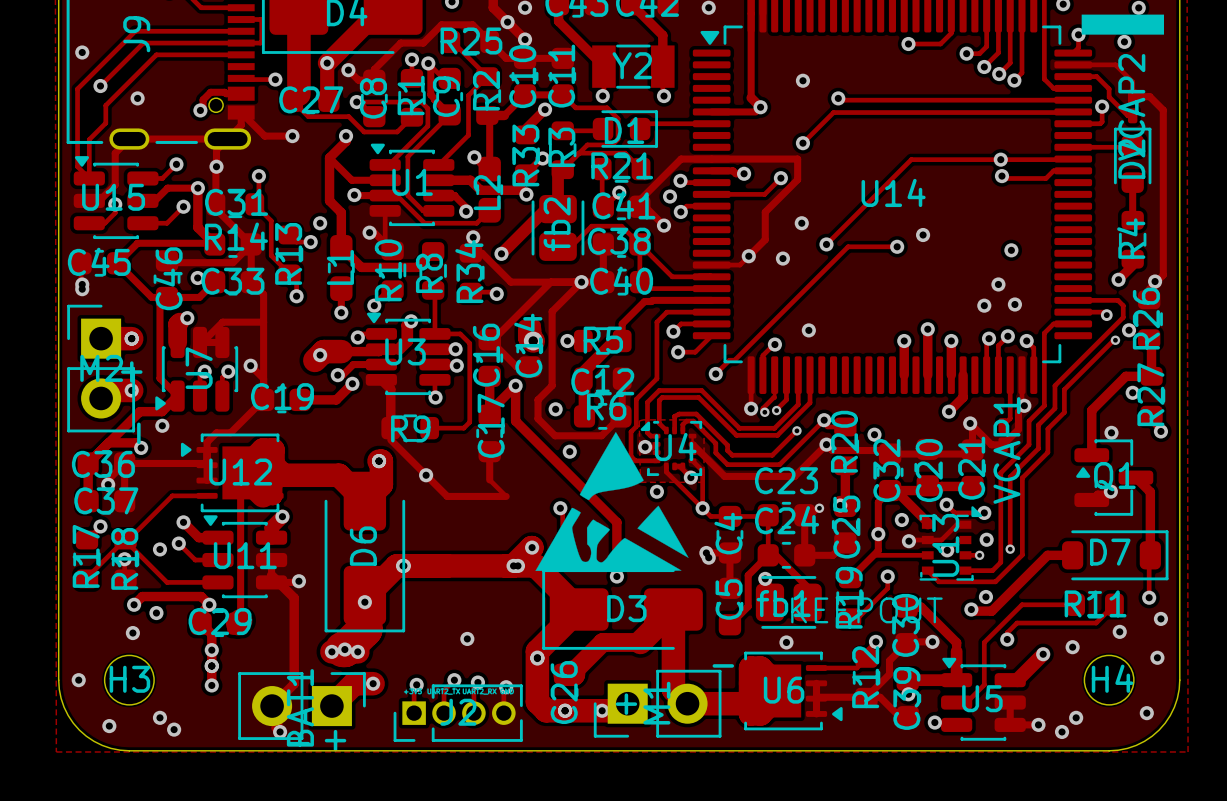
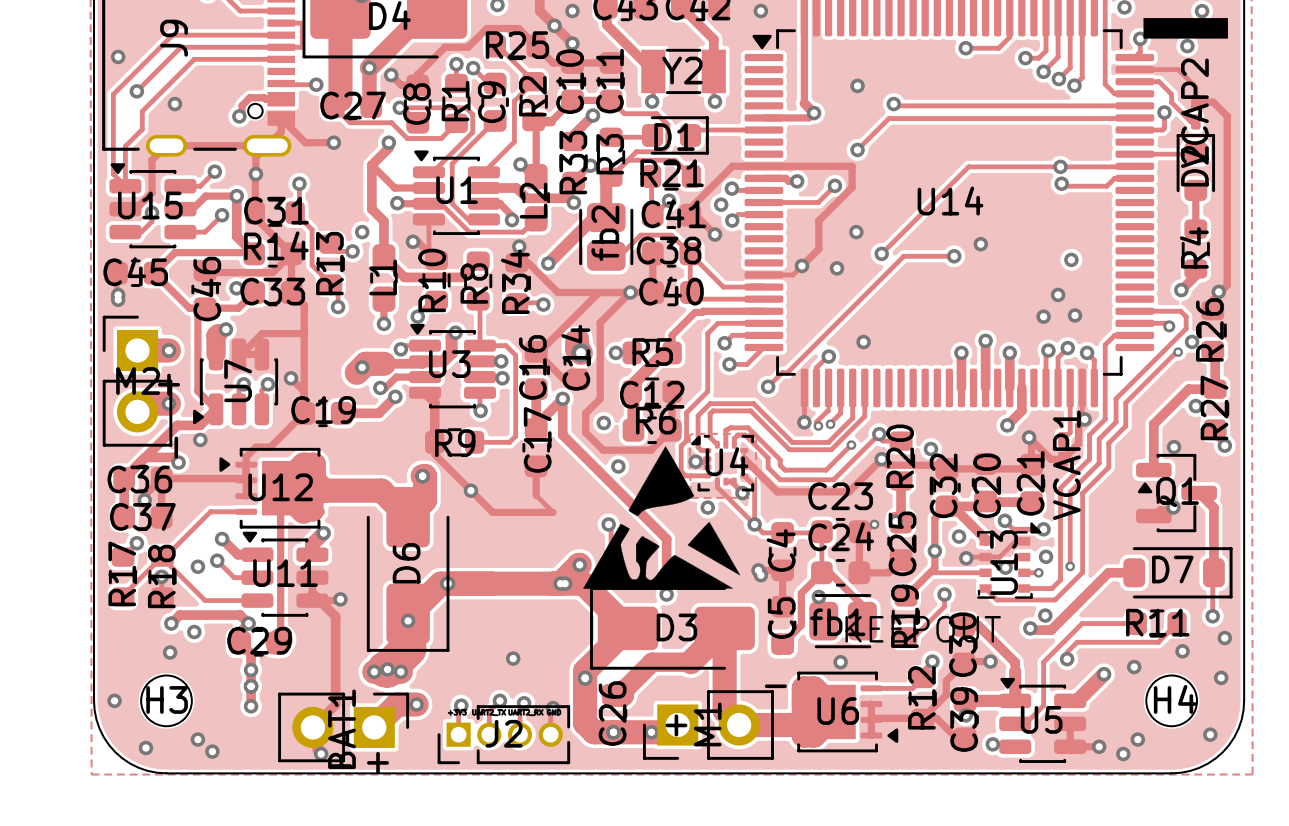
track: (430, 65) (430, 94) (449, 114) -> none

